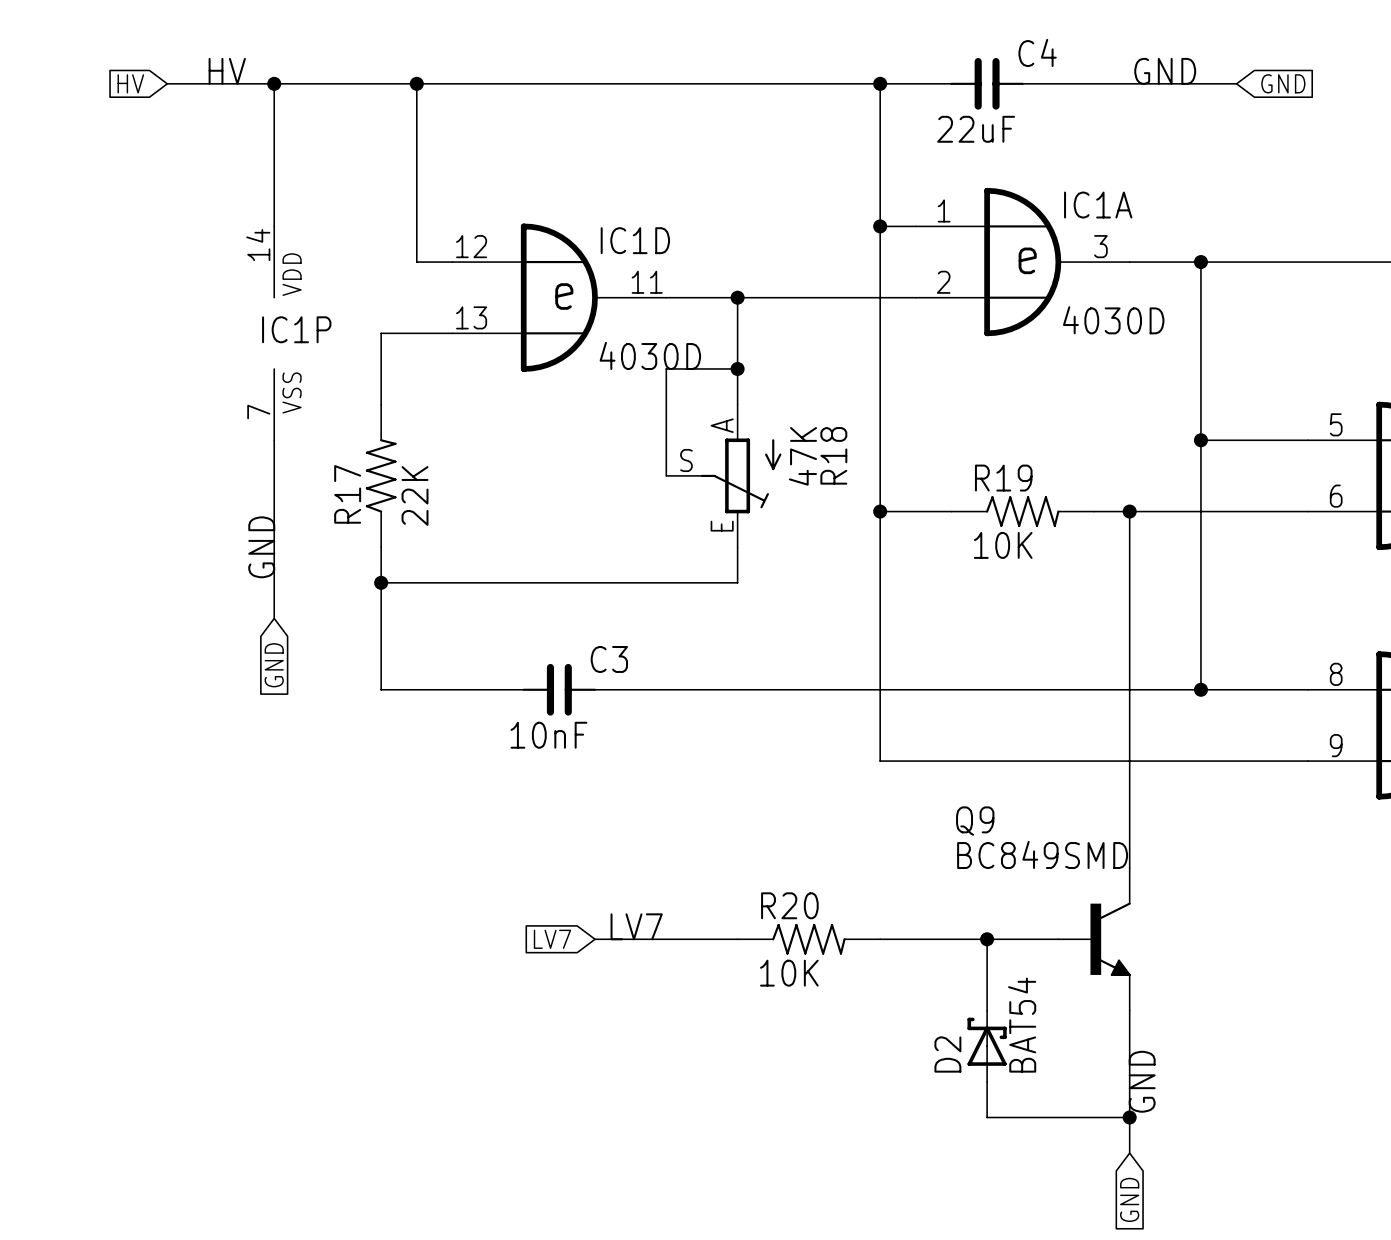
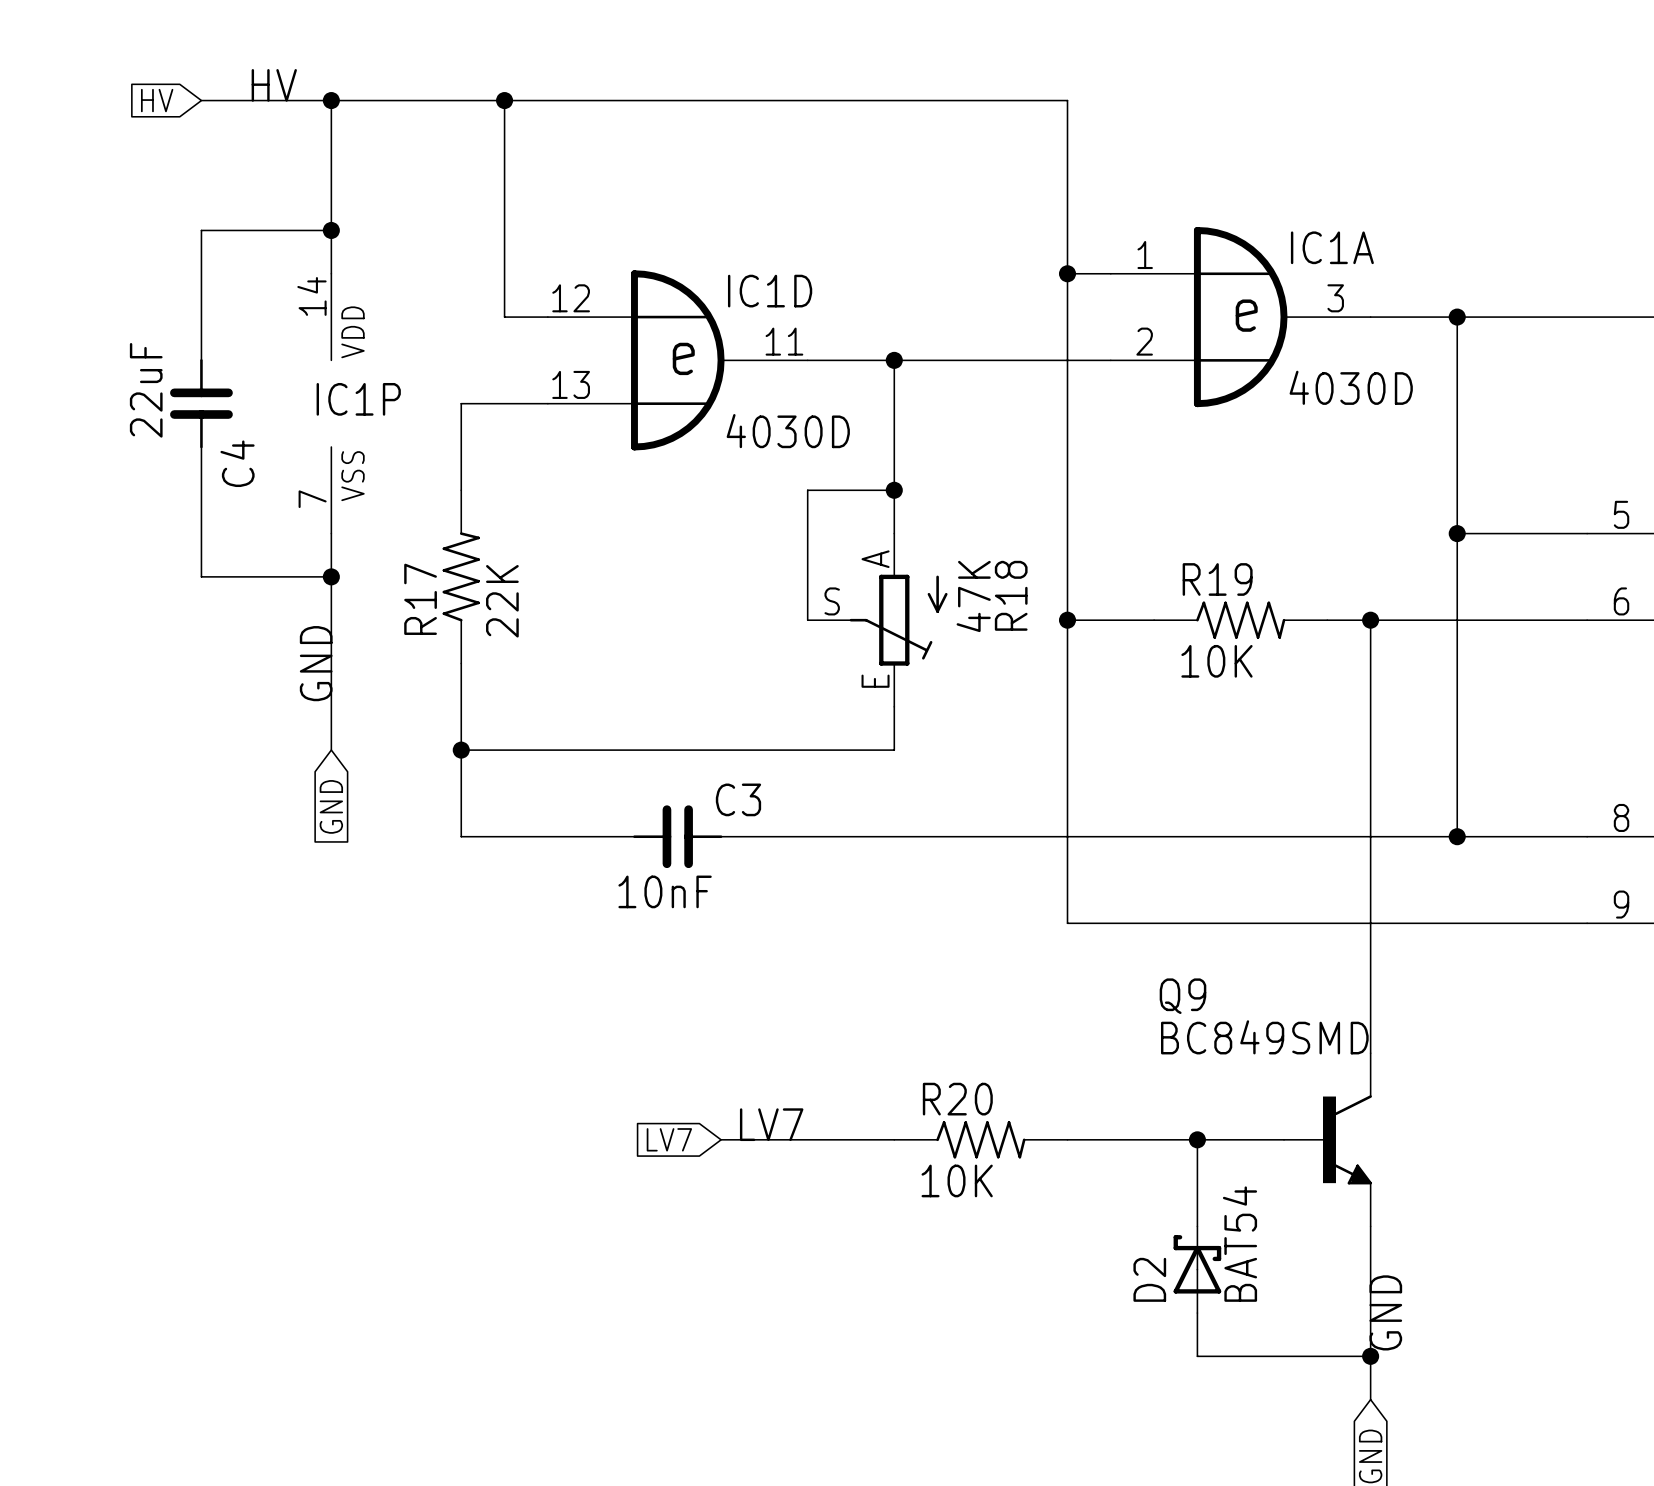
label: GND (1165, 71) -> none
wire: (880, 83) (951, 83) -> none
junction: (880, 83) -> none
C4 rotation: 0° (987, 83) -> 90° clockwise (201, 403)
C4 position: (987, 83) -> (201, 403)
wire: (1022, 83) (1236, 83) -> none
global label: GND (1283, 83) -> none
wire: none -> (331, 230) (201, 230) (201, 360)
junction: none -> (331, 230)
wire: none -> (201, 446) (201, 576) (331, 576)
wire: (737, 368) (666, 368) (666, 404) -> (894, 533) (894, 490) (807, 490)
junction position: (737, 368) -> (894, 490)
junction: none -> (331, 576)
wire: none -> (807, 576) (807, 620)
R18 position: (723, 475) -> (877, 620)
wire: (737, 547) (737, 582) (381, 582) -> (894, 706) (894, 750) (461, 750)
junction position: (381, 582) -> (461, 750)

